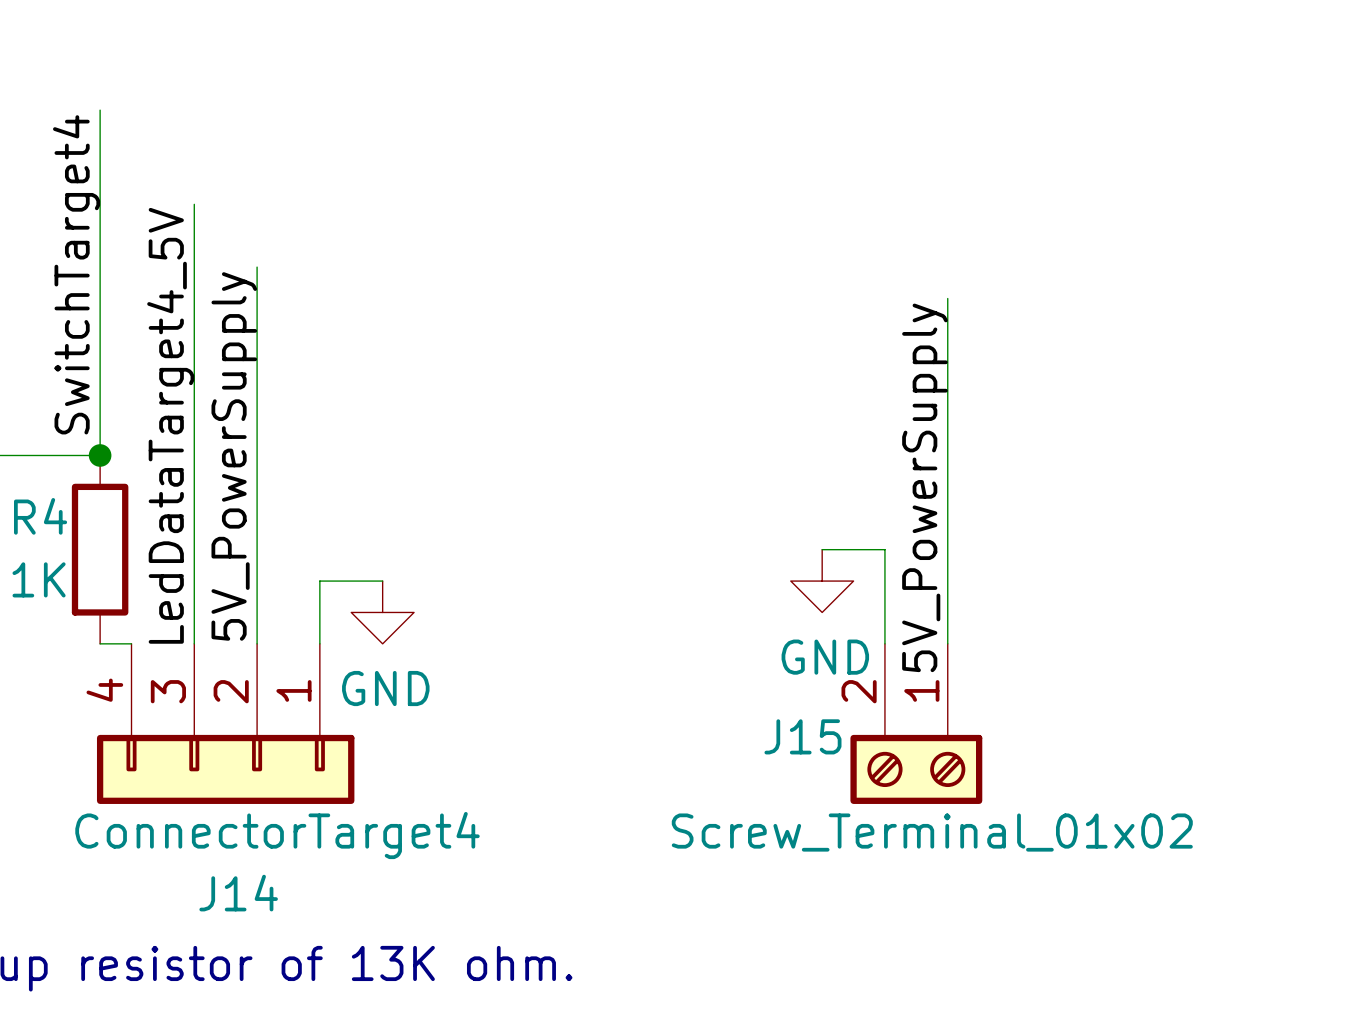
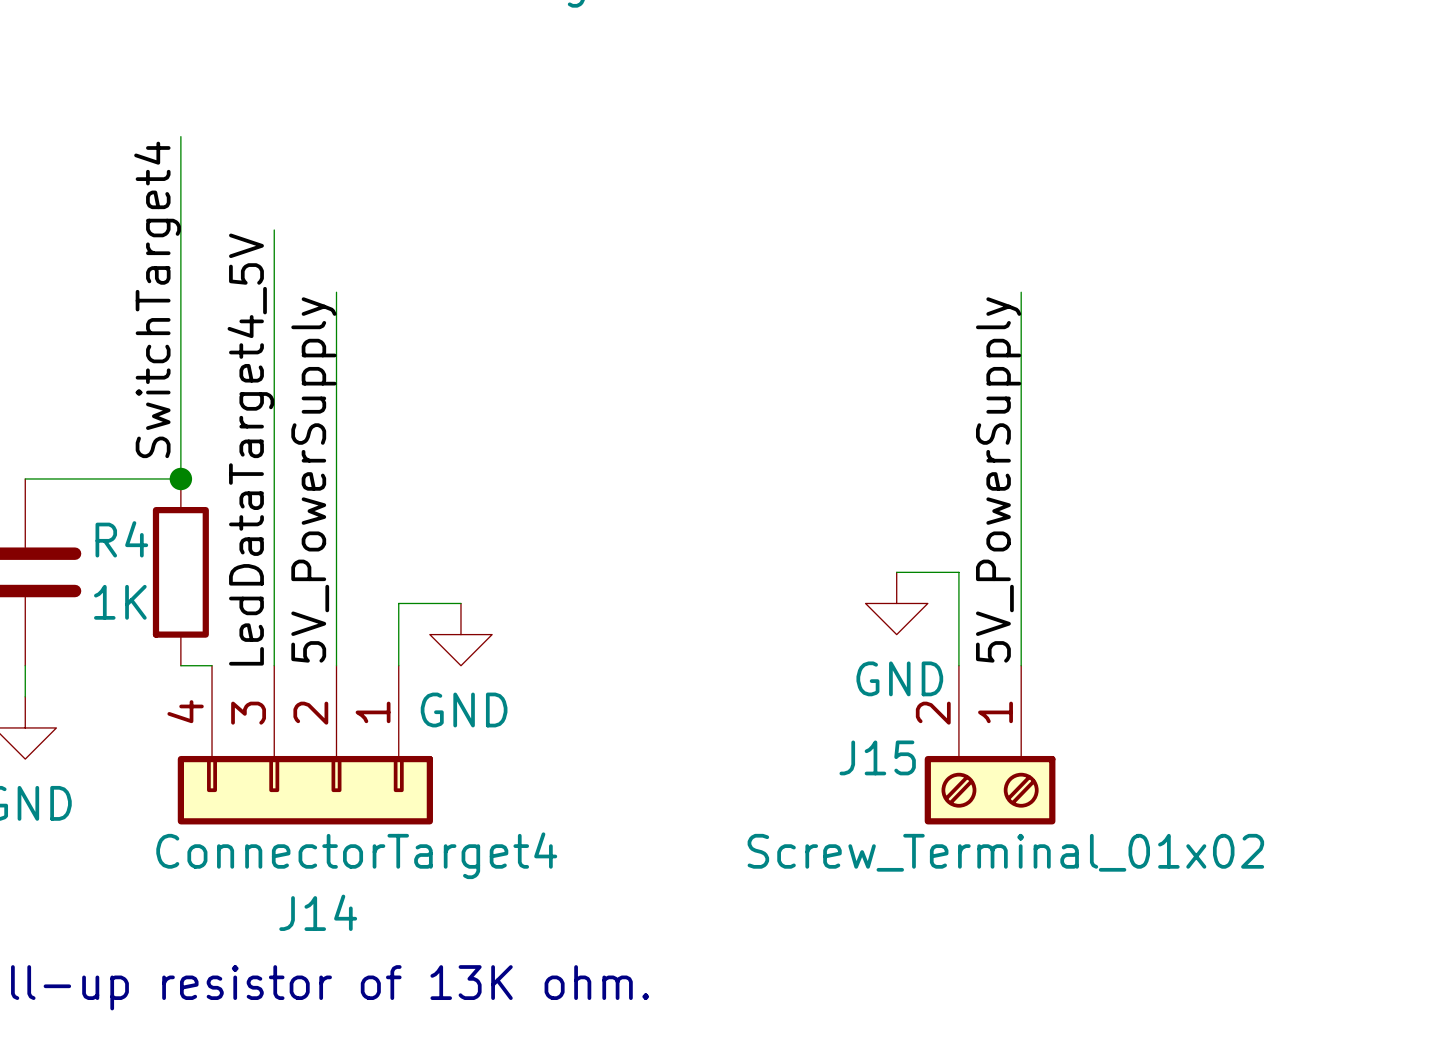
wire: none -> (1021, 292) (1021, 323)
label position: 5V_PowerSupply (924, 487) -> 5V_PowerSupply (998, 479)

